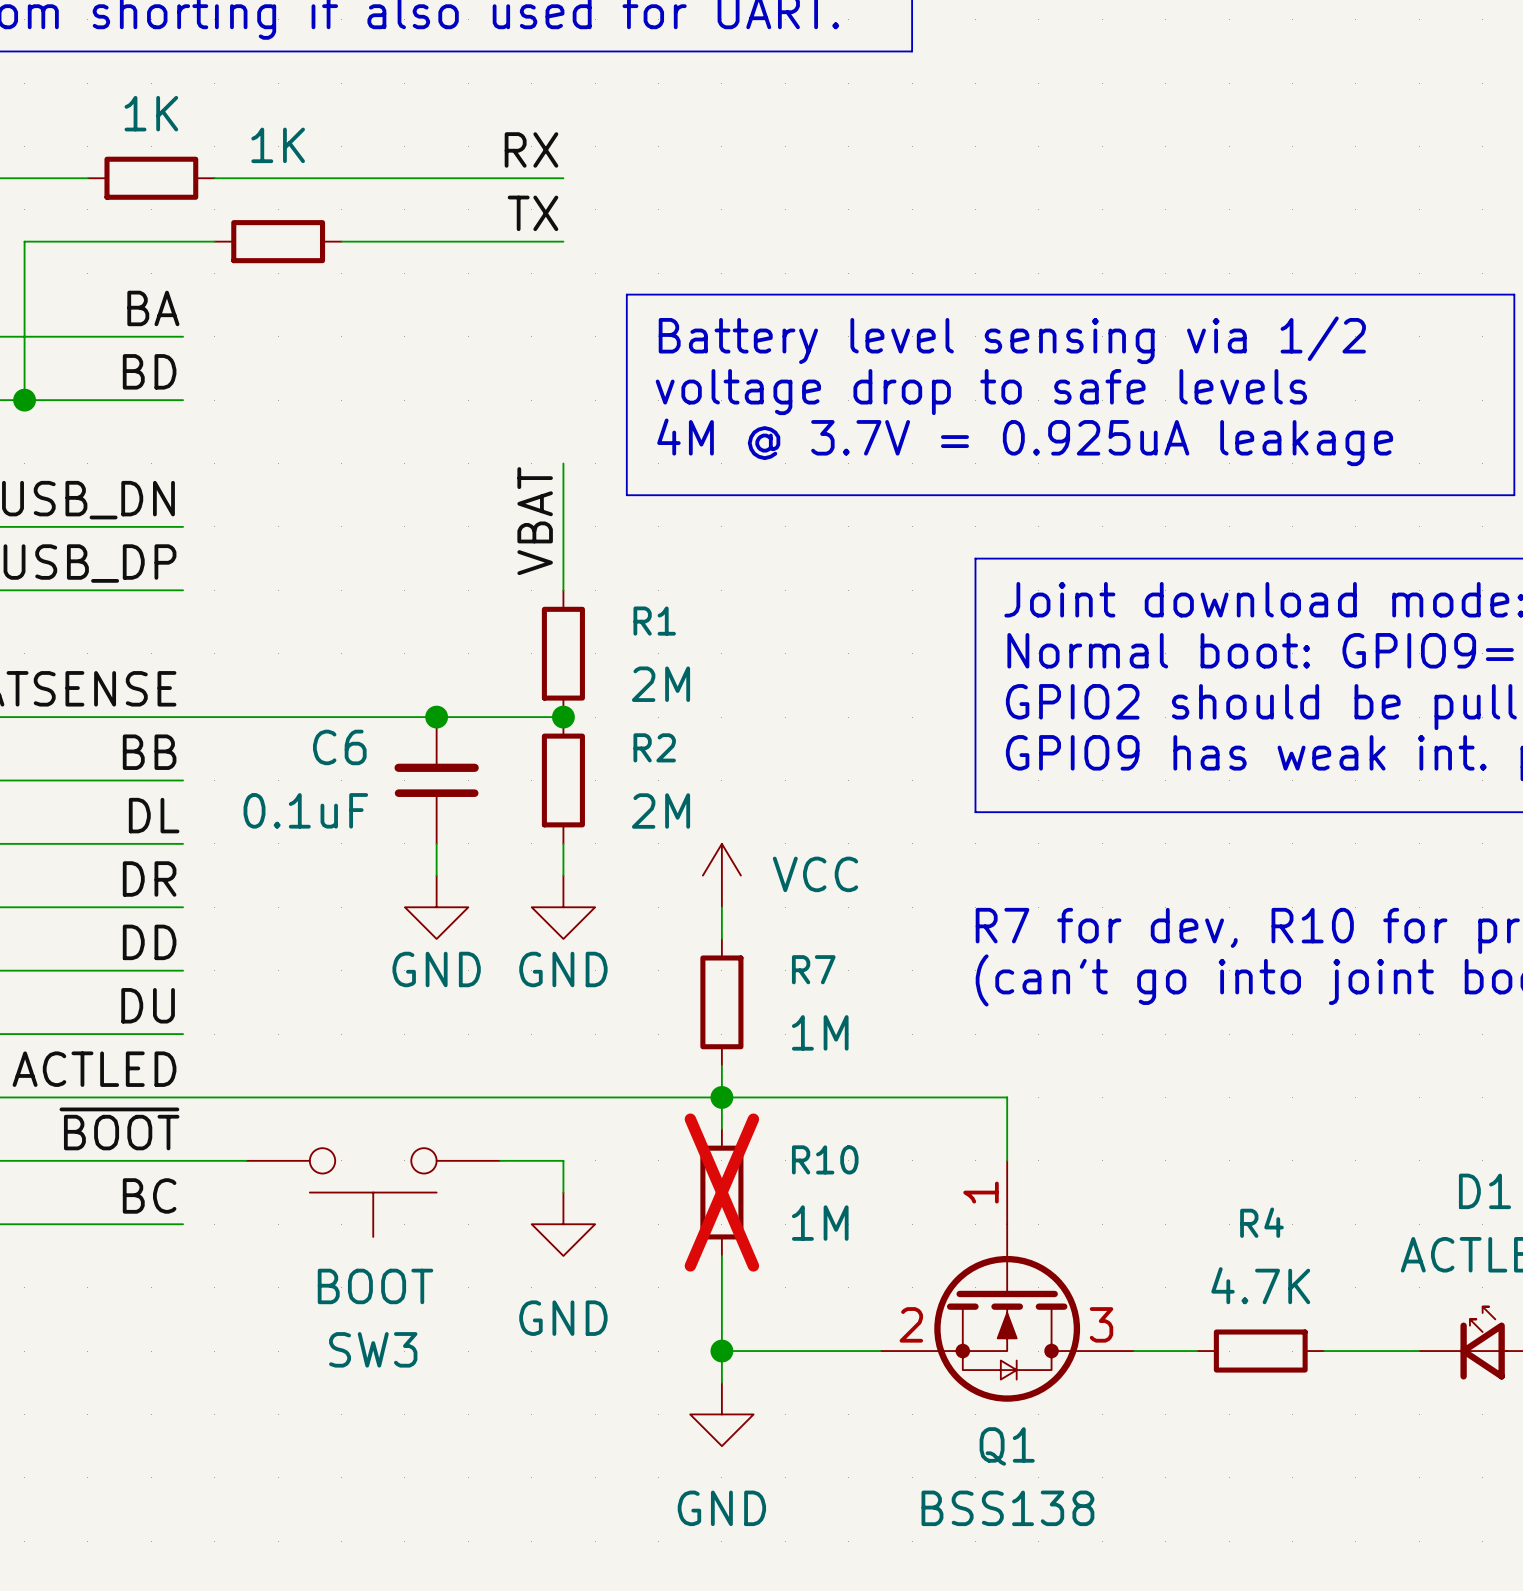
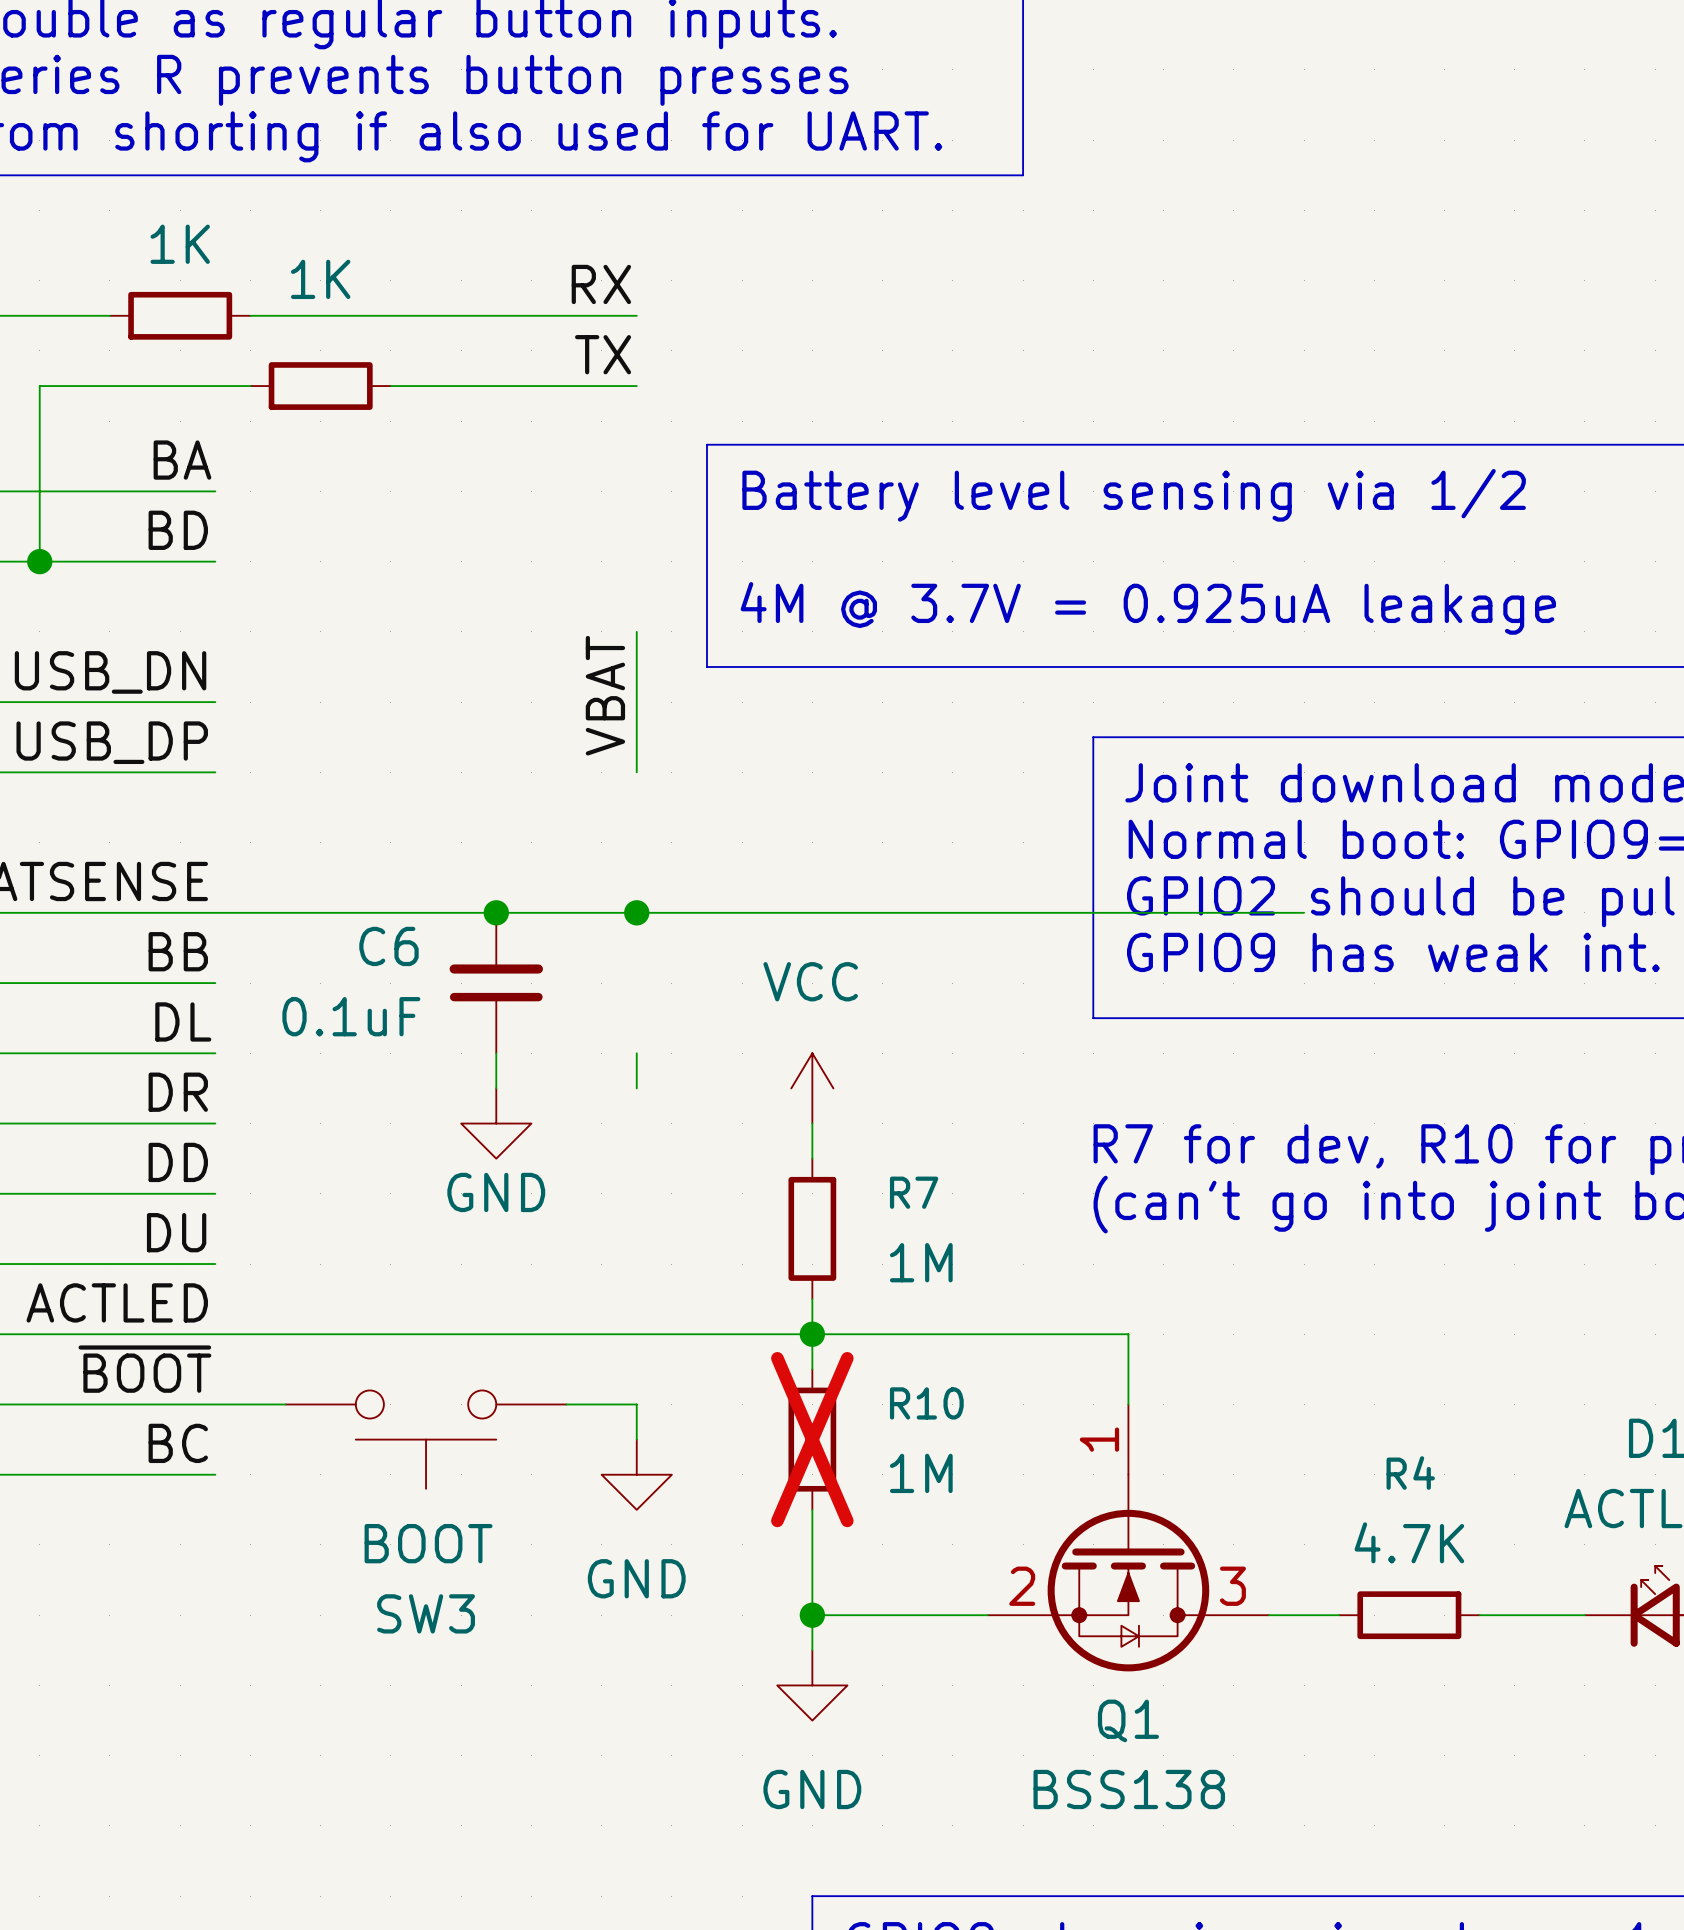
text: voltage drop to safe levels (981, 392) -> none
R1: 2M (563, 653) -> none
wire: none -> (636, 912) (1304, 912)
R2: 2M (563, 780) -> none
power symbol text position: VCC (815, 874) -> VCC (810, 981)
power symbol: GND (563, 907) -> none

